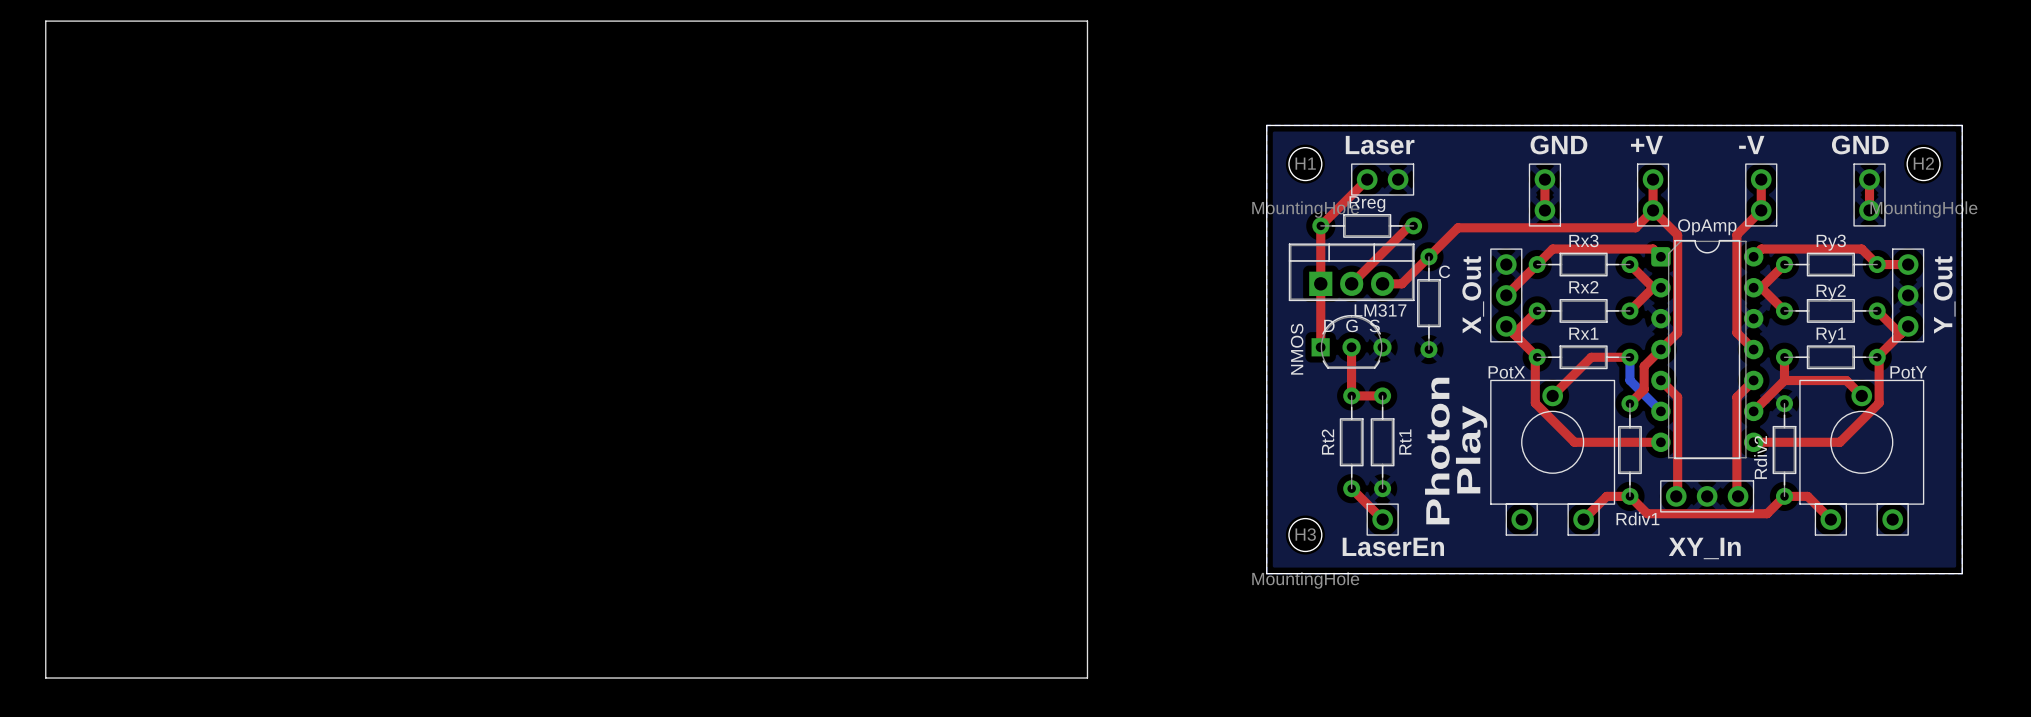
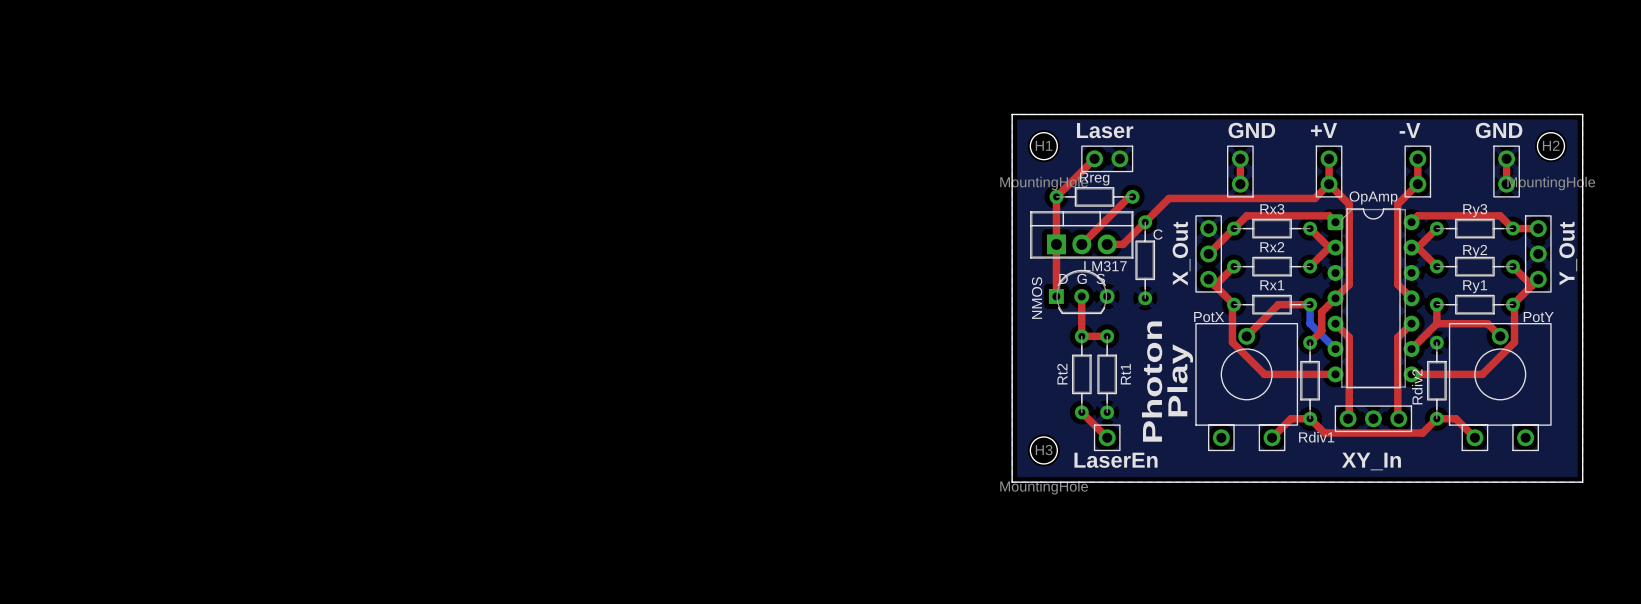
line: (45, 21) (1087, 21) (1087, 678) (45, 678) (45, 21) -> none

